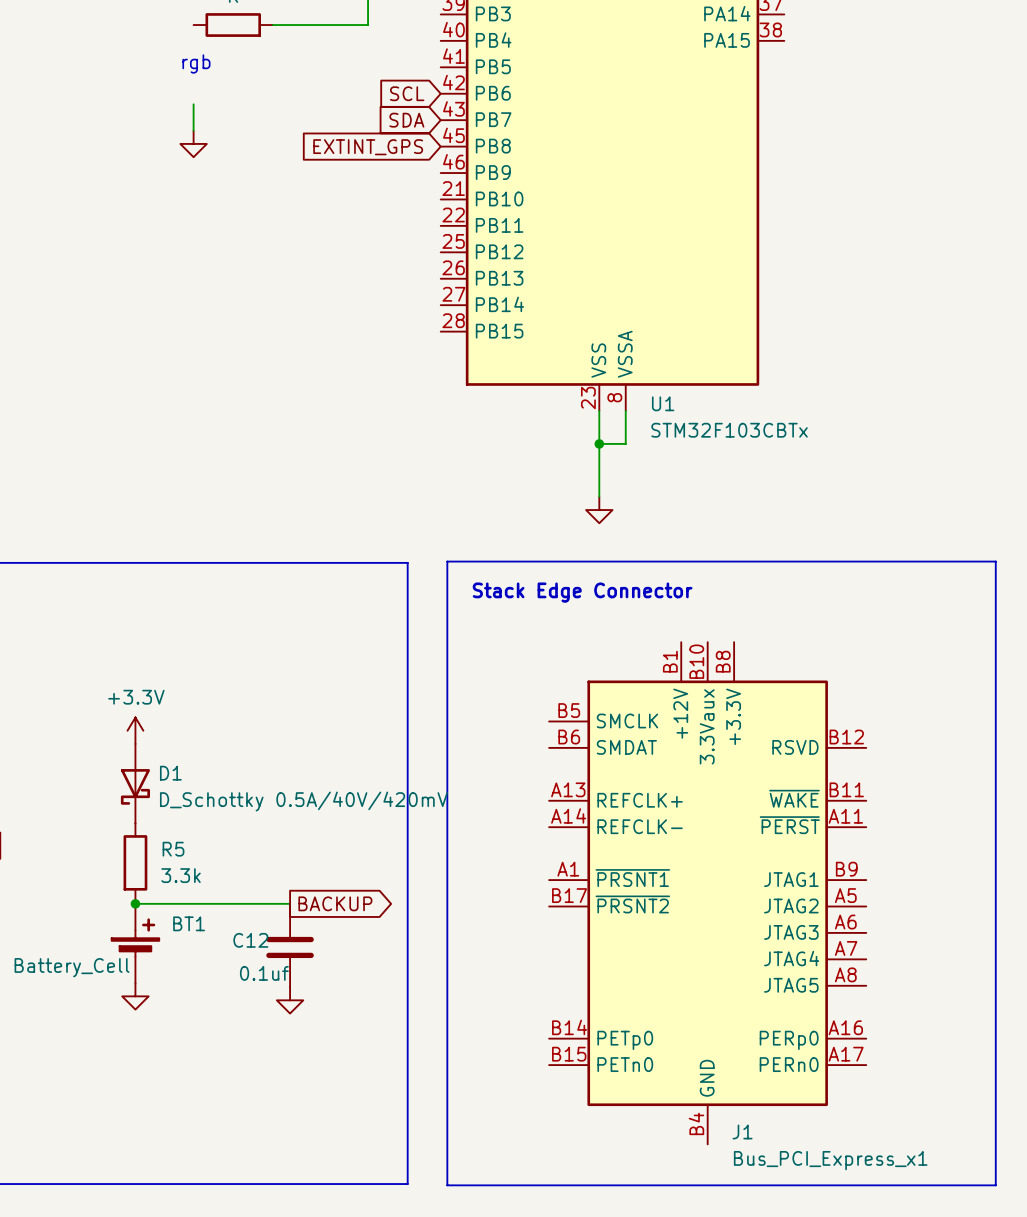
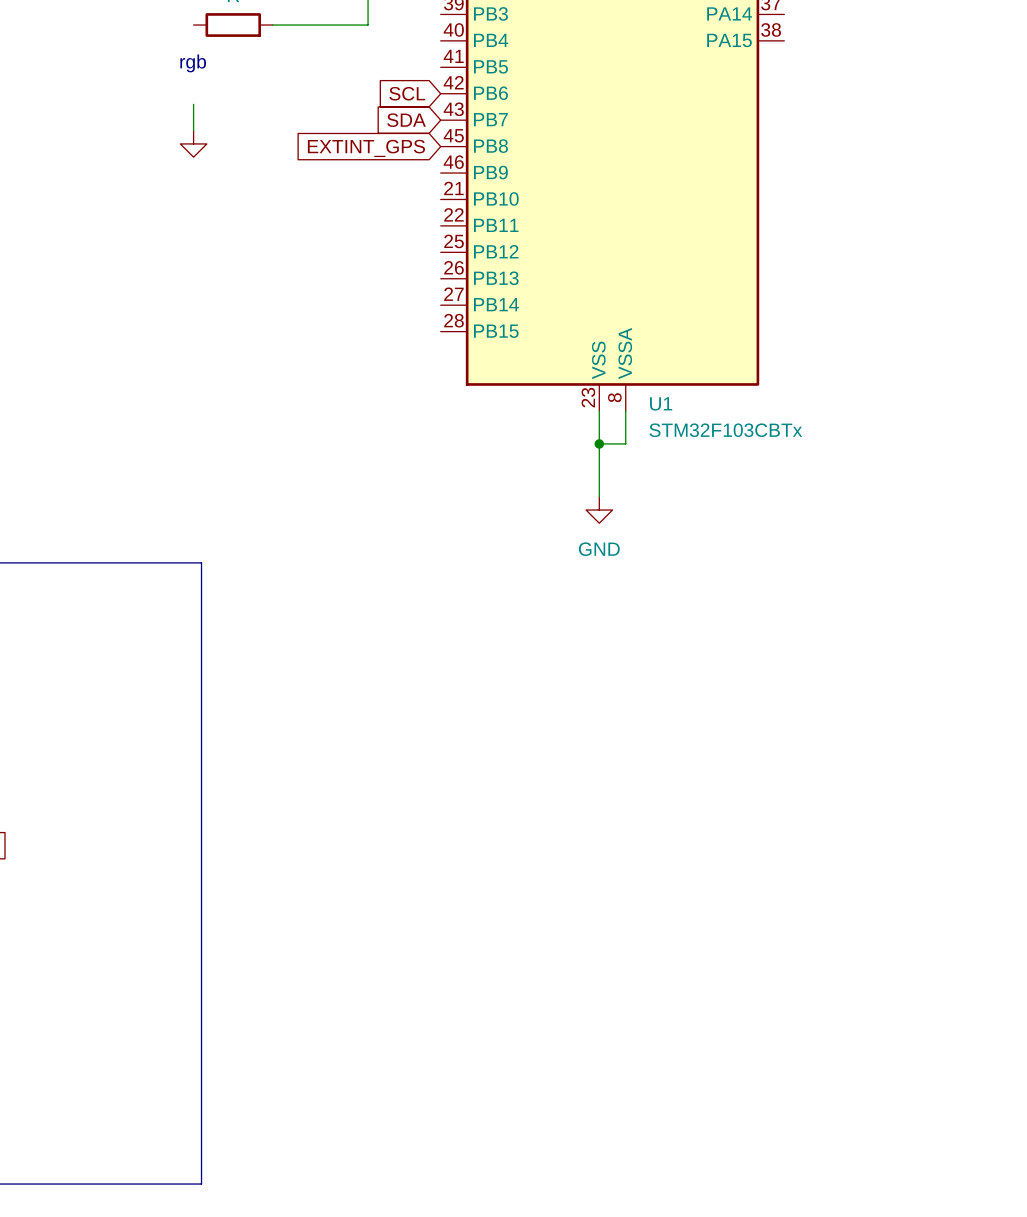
power symbol text: none -> GND (599, 549)
line: (447, 561) (995, 561) (995, 1185) (447, 1185) (447, 561) -> none
line: (201, 562) (407, 562) (407, 1184) (201, 1184) -> (201, 562) (201, 1184)
text: Stack Edge Connector (582, 592) -> none
power symbol: +3.3V (135, 730) -> none
D1: D_Schottky 0.5A/40V/420mV (135, 783) -> none
R5: 3.3k (135, 862) -> none
J1: Bus_PCI_Express_x1 (707, 893) -> none
wire: (135, 902) (290, 903) (290, 907) -> none
junction: (135, 903) -> none
global label: BACKUP (335, 903) -> none
BT1: Battery_Cell (135, 943) -> none
C12: 0.1uf (290, 947) -> none
power symbol: (135, 996) -> none
power symbol: (290, 1000) -> none

